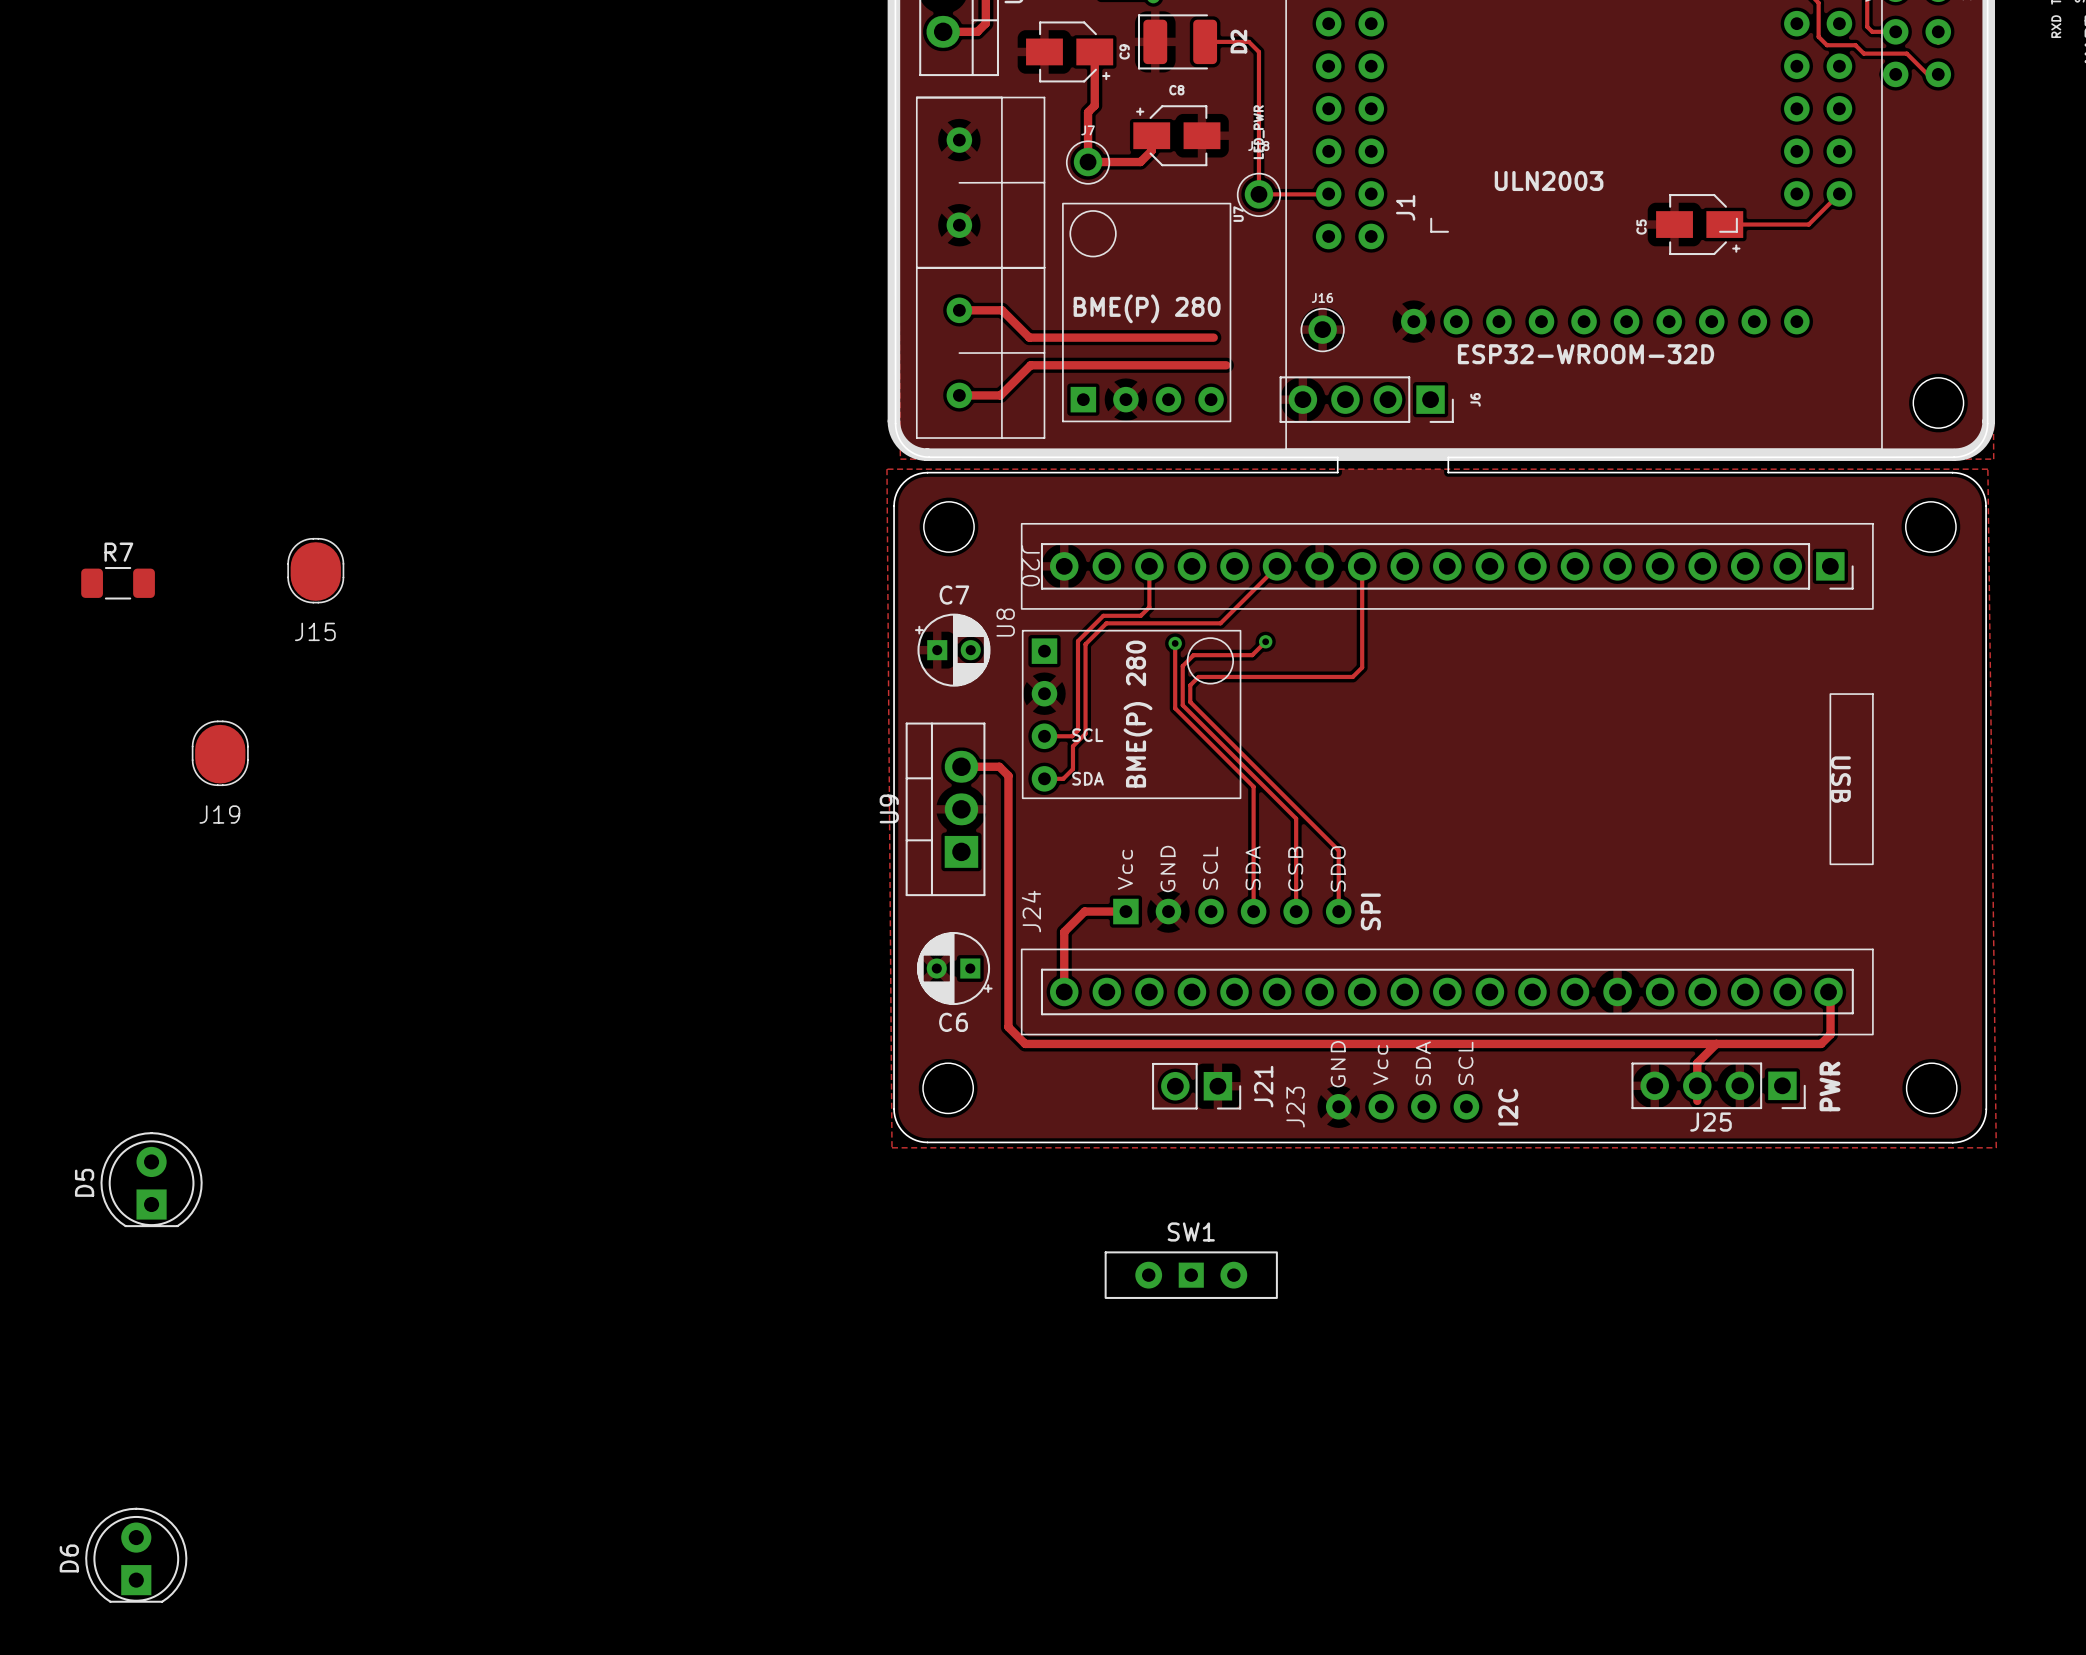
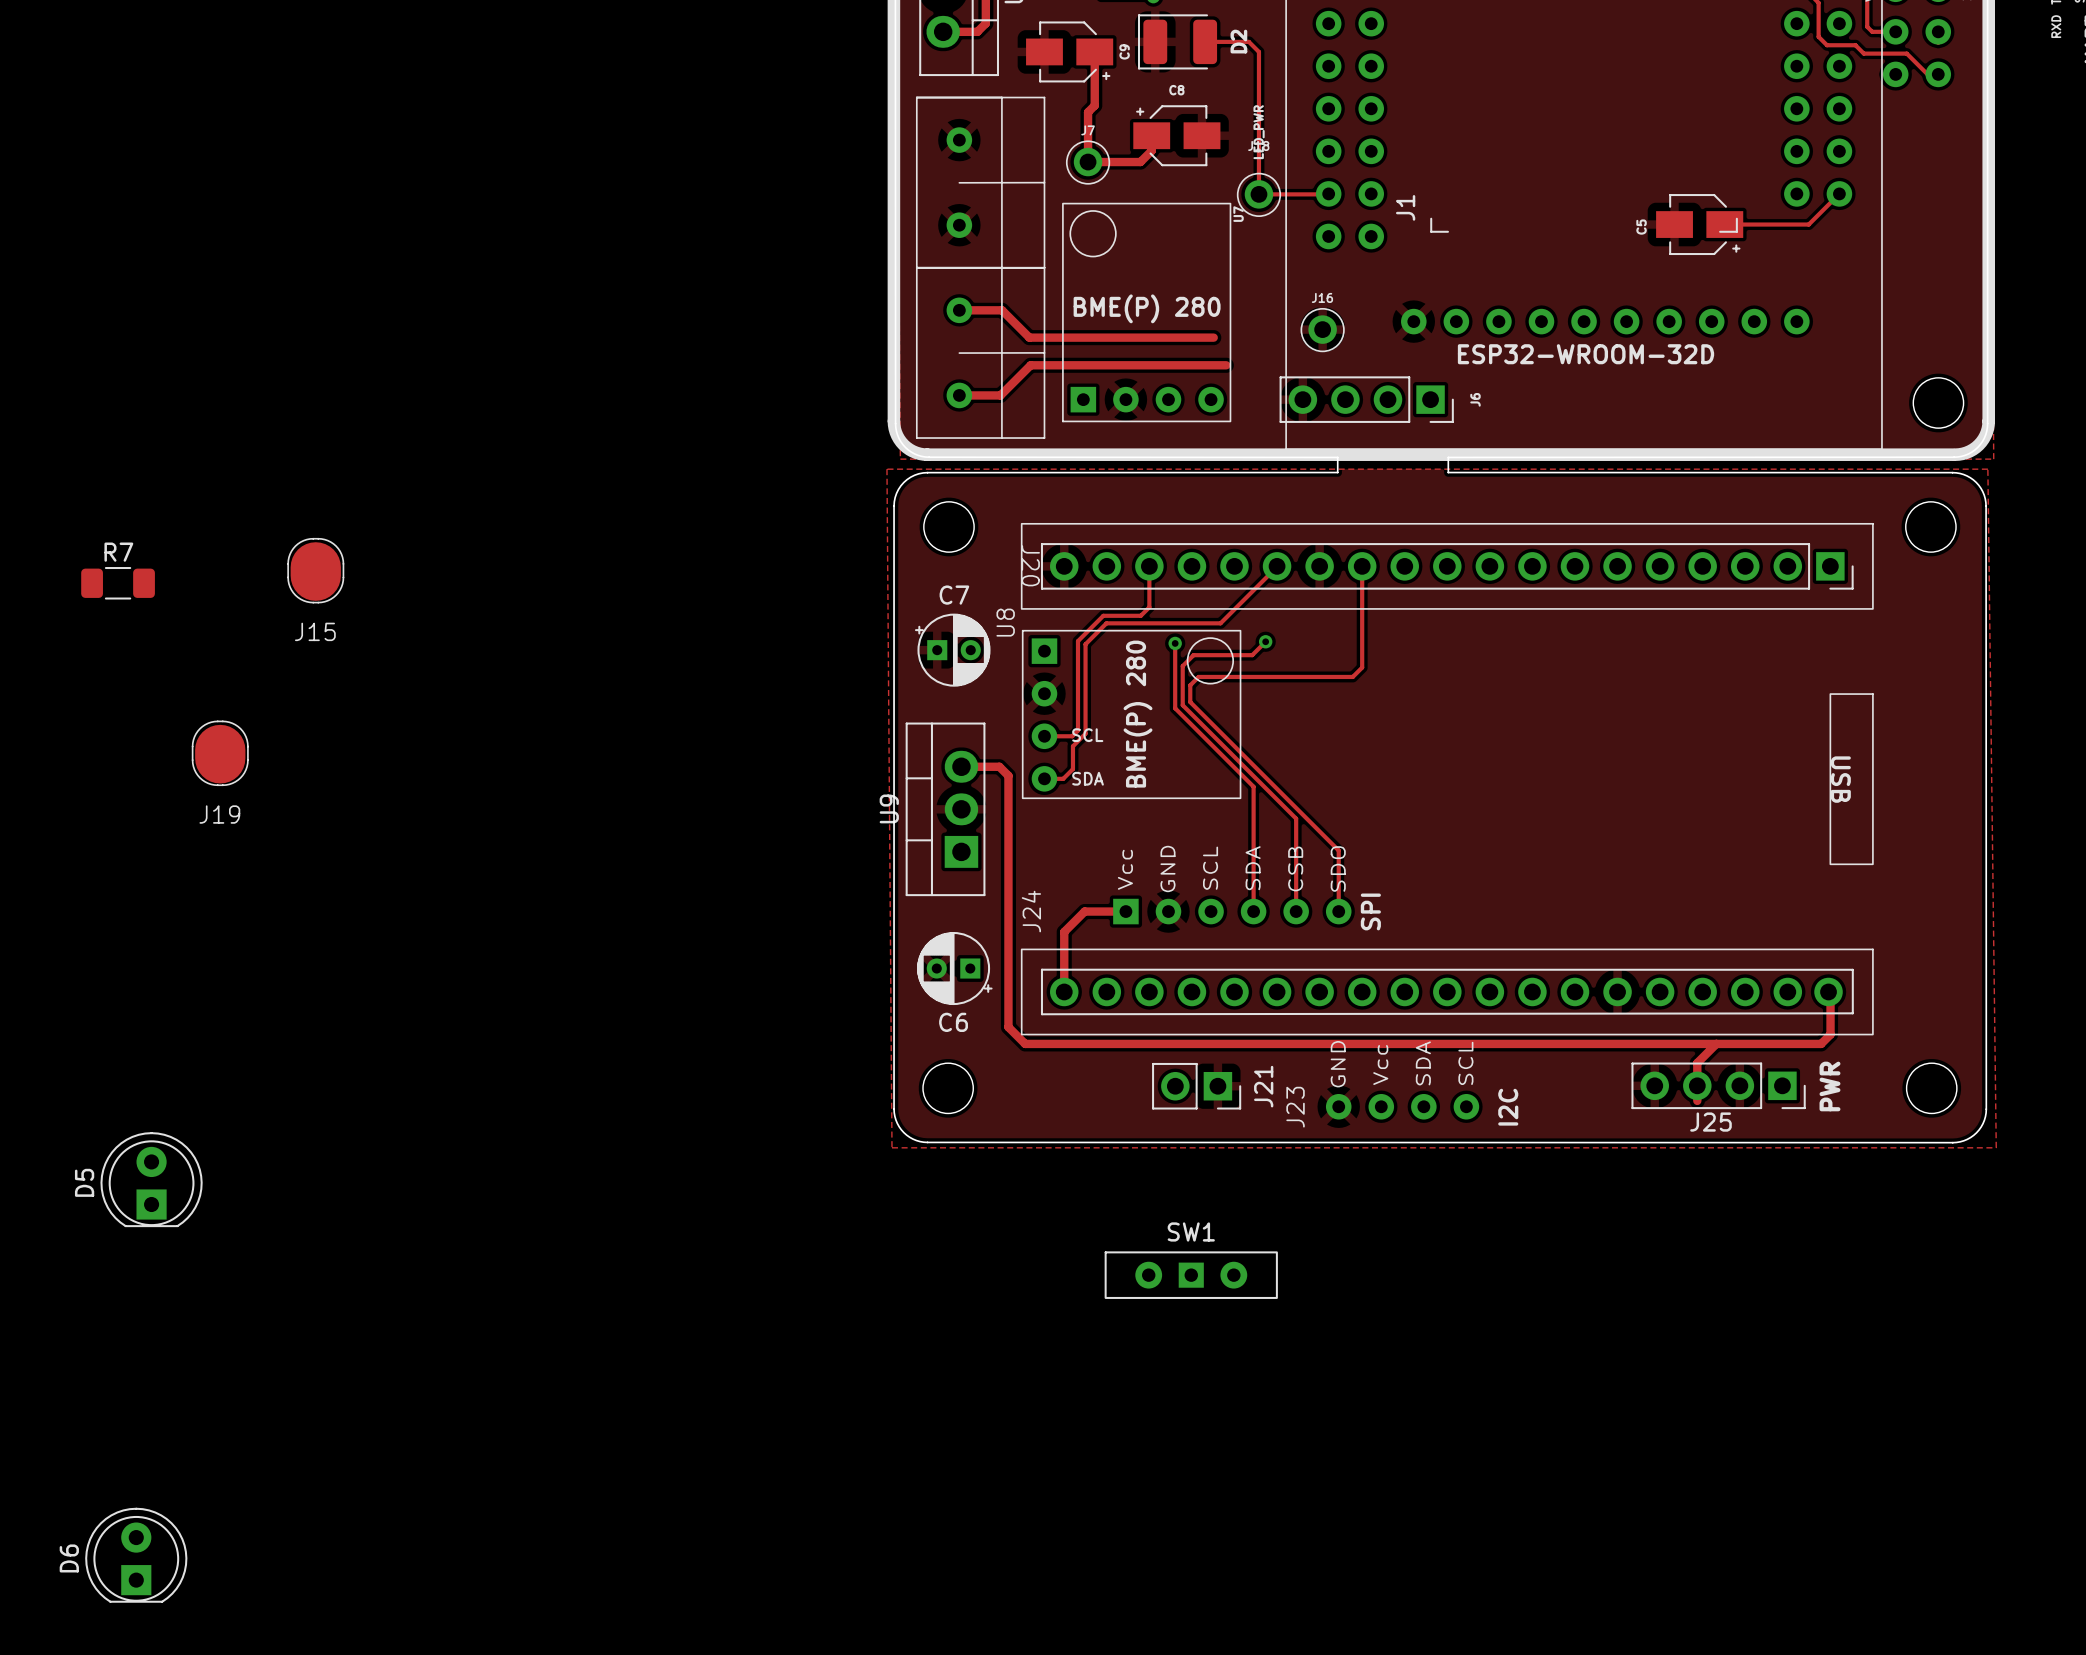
text: ULN2003 (1549, 180) -> none

